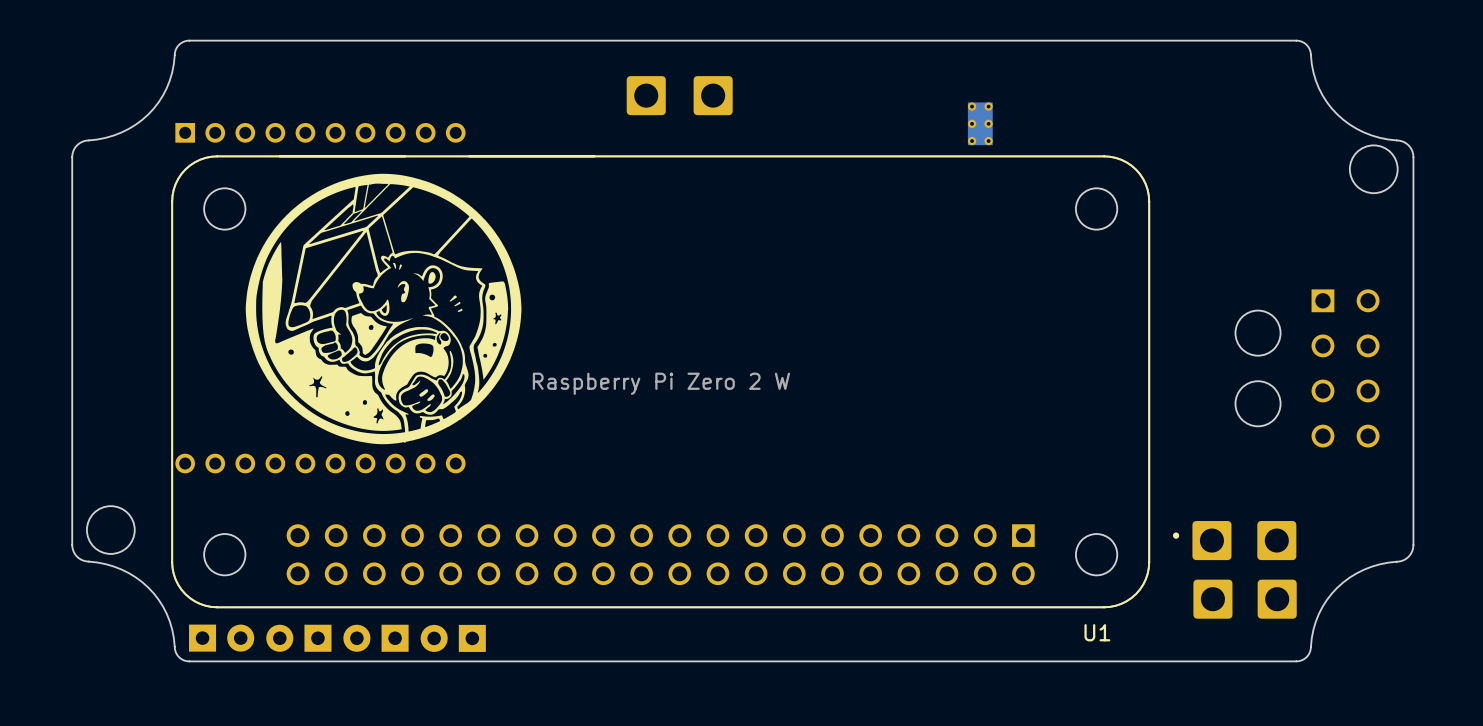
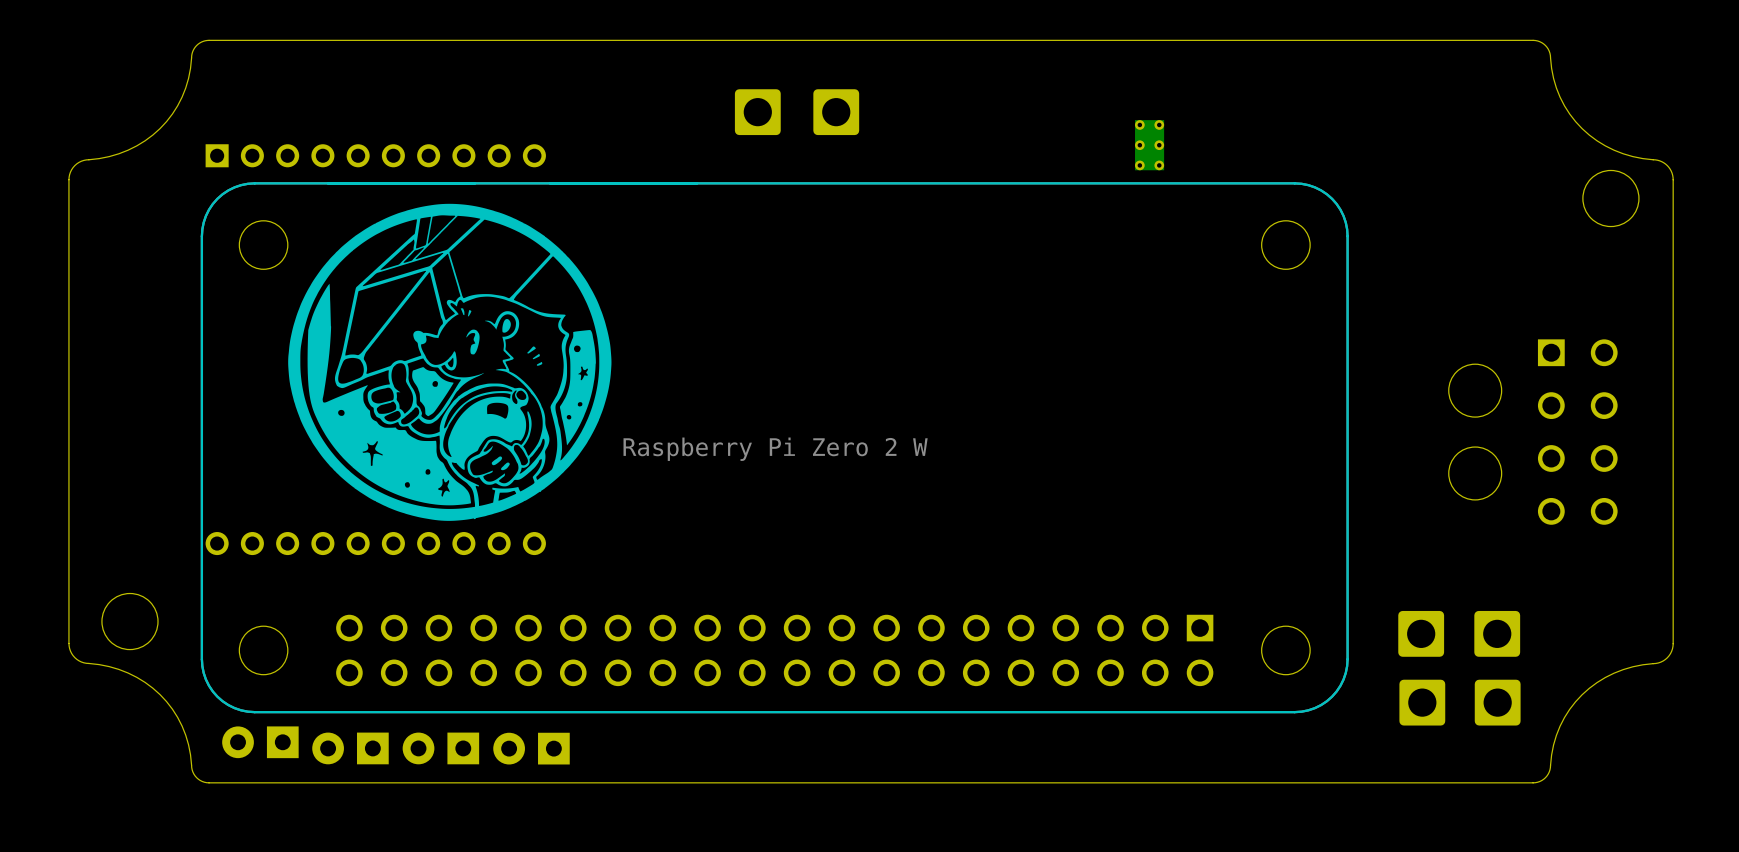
board edge: none -> (191, 57) (188, 78) (182, 97) (172, 114) (159, 128) (145, 140) (128, 150) (109, 156) (78, 162) (71, 169) (68, 179) (69, 648) (73, 655) (78, 660) (109, 666) (128, 673) (145, 682) (159, 694) (172, 709) (182, 726) (188, 744) (191, 765)
board edge: none -> (1550, 57) (1545, 45) (1533, 40) (209, 40) (196, 45) (191, 57)
board edge: none -> (1550, 57) (1553, 78) (1560, 97) (1569, 114) (1582, 128) (1597, 140) (1614, 150) (1632, 156) (1661, 161) (1668, 167) (1672, 175) (1673, 643) (1670, 653) (1663, 660) (1632, 666) (1614, 673) (1597, 682) (1582, 694) (1569, 709) (1560, 726) (1553, 744) (1549, 769) (1541, 780) (1533, 782) (209, 782)
board edge: (174, 55) (172, 72) (166, 88) (148, 114) (121, 132) (80, 142) (74, 148) (72, 157) (72, 549) (80, 559) (121, 569) (148, 587) (166, 613) (172, 629) (174, 646) -> none
board edge: (1310, 55) (1306, 44) (1296, 40) (189, 40) (179, 44) (174, 55) -> none
board edge: (1310, 55) (1313, 72) (1318, 88) (1337, 114) (1364, 132) (1405, 142) (1412, 152) (1413, 545) (1411, 553) (1405, 559) (1364, 569) (1337, 587) (1318, 614) (1313, 629) (1310, 651) (1302, 659) (189, 661) (179, 657) (174, 646) -> none
U1: Raspberry Pi Zero 2 W (675, 381) -> none
part rotation: 0° (221, 638) -> 180° (260, 742)
board edge: none -> (191, 765) (196, 777) (209, 782)

